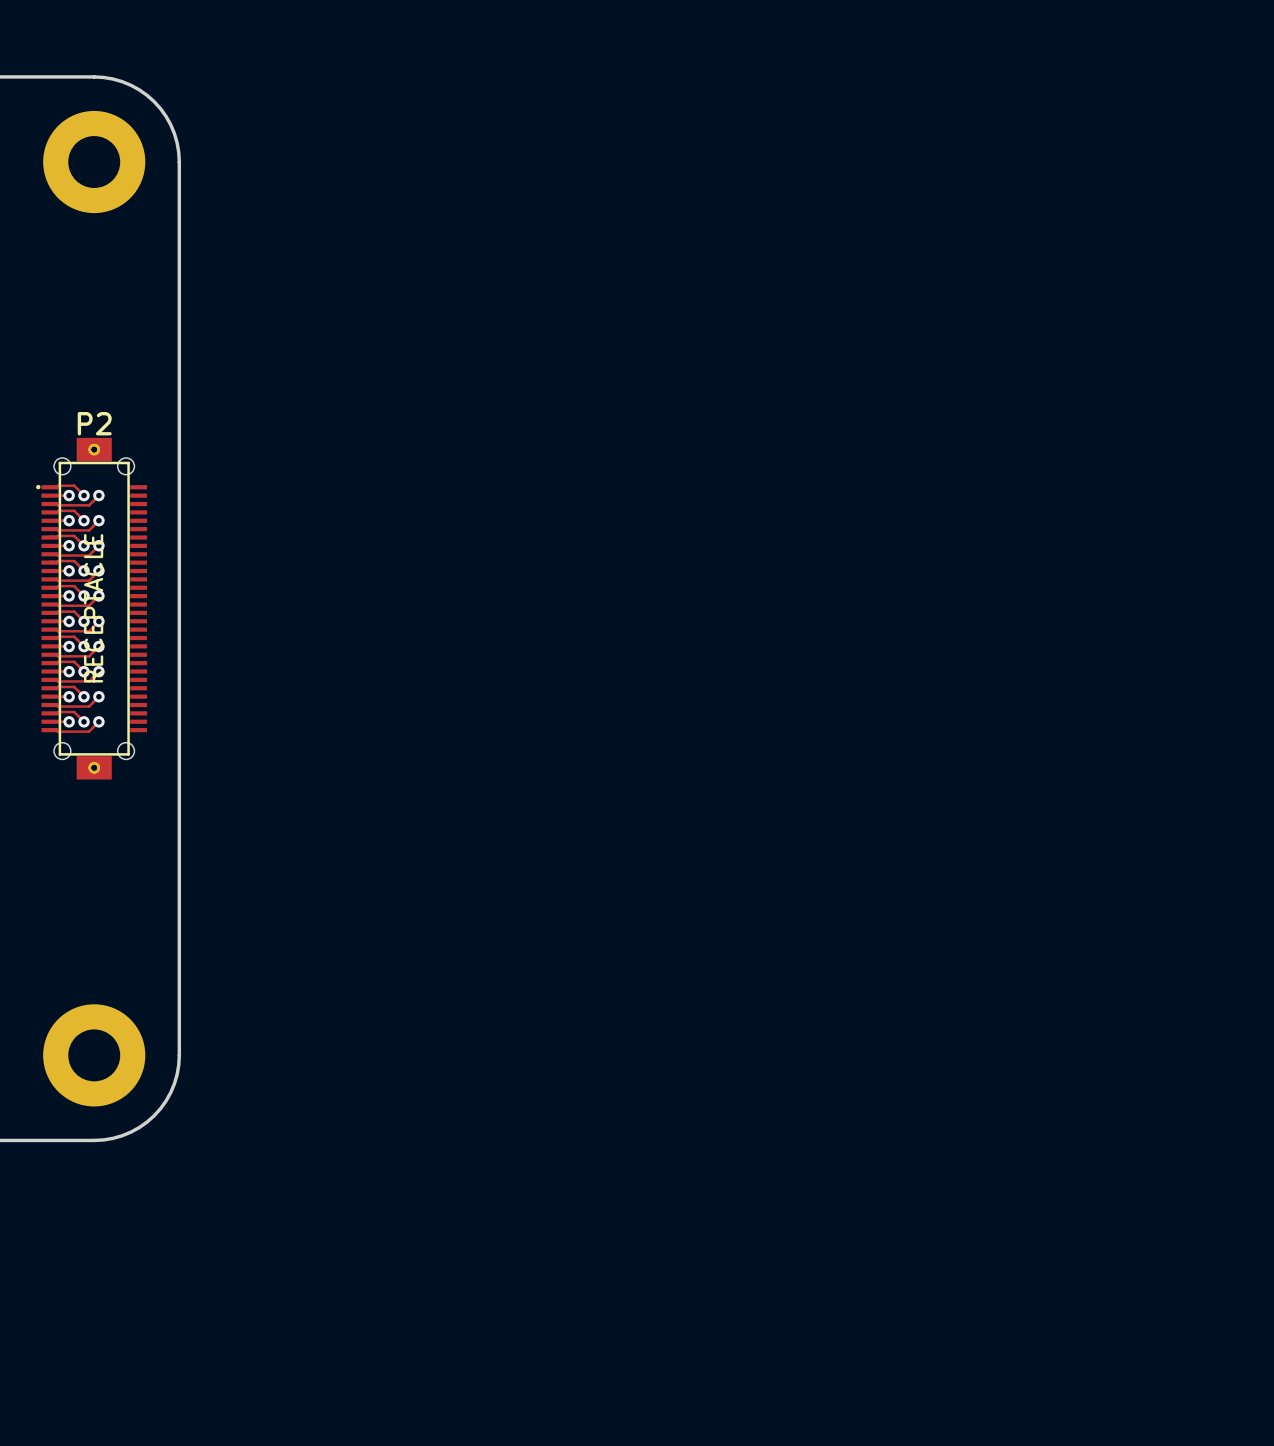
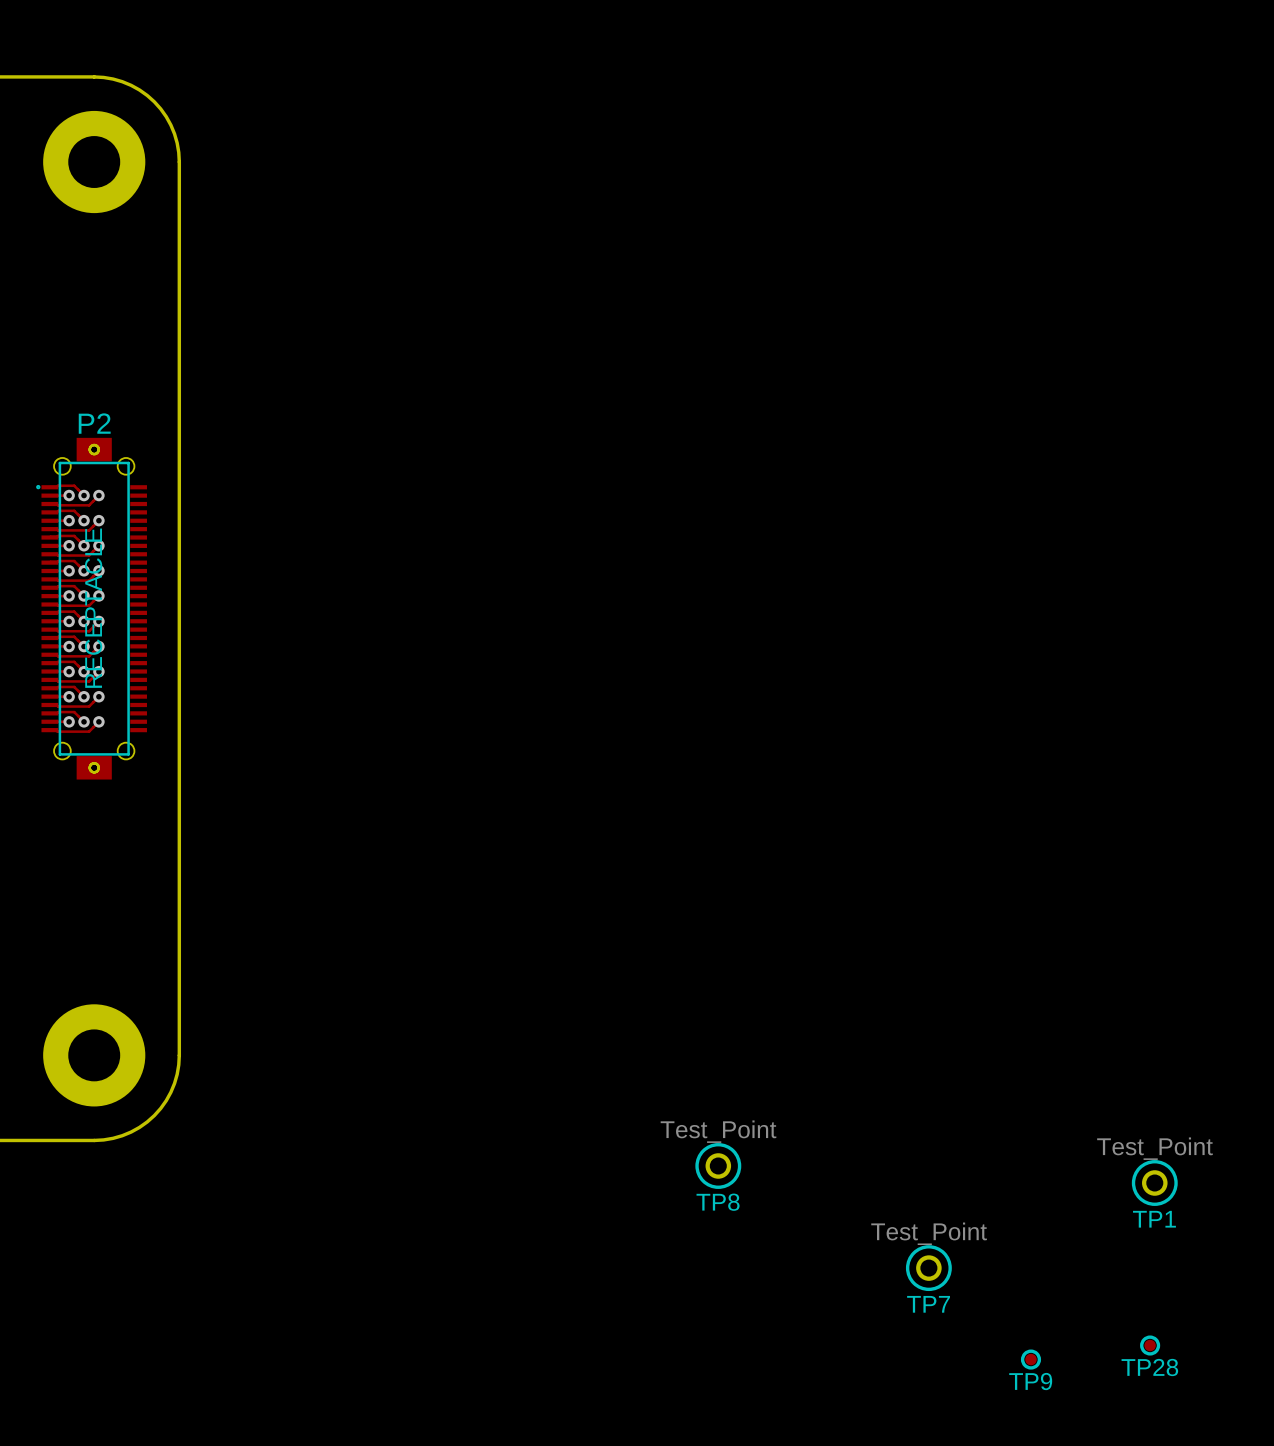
TP8: none -> Test_Point (718, 1165)
TP1: none -> Test_Point (1154, 1183)
TP7: none -> Test_Point (928, 1268)
TP28: none -> (1150, 1345)
TP9: none -> (1030, 1359)

